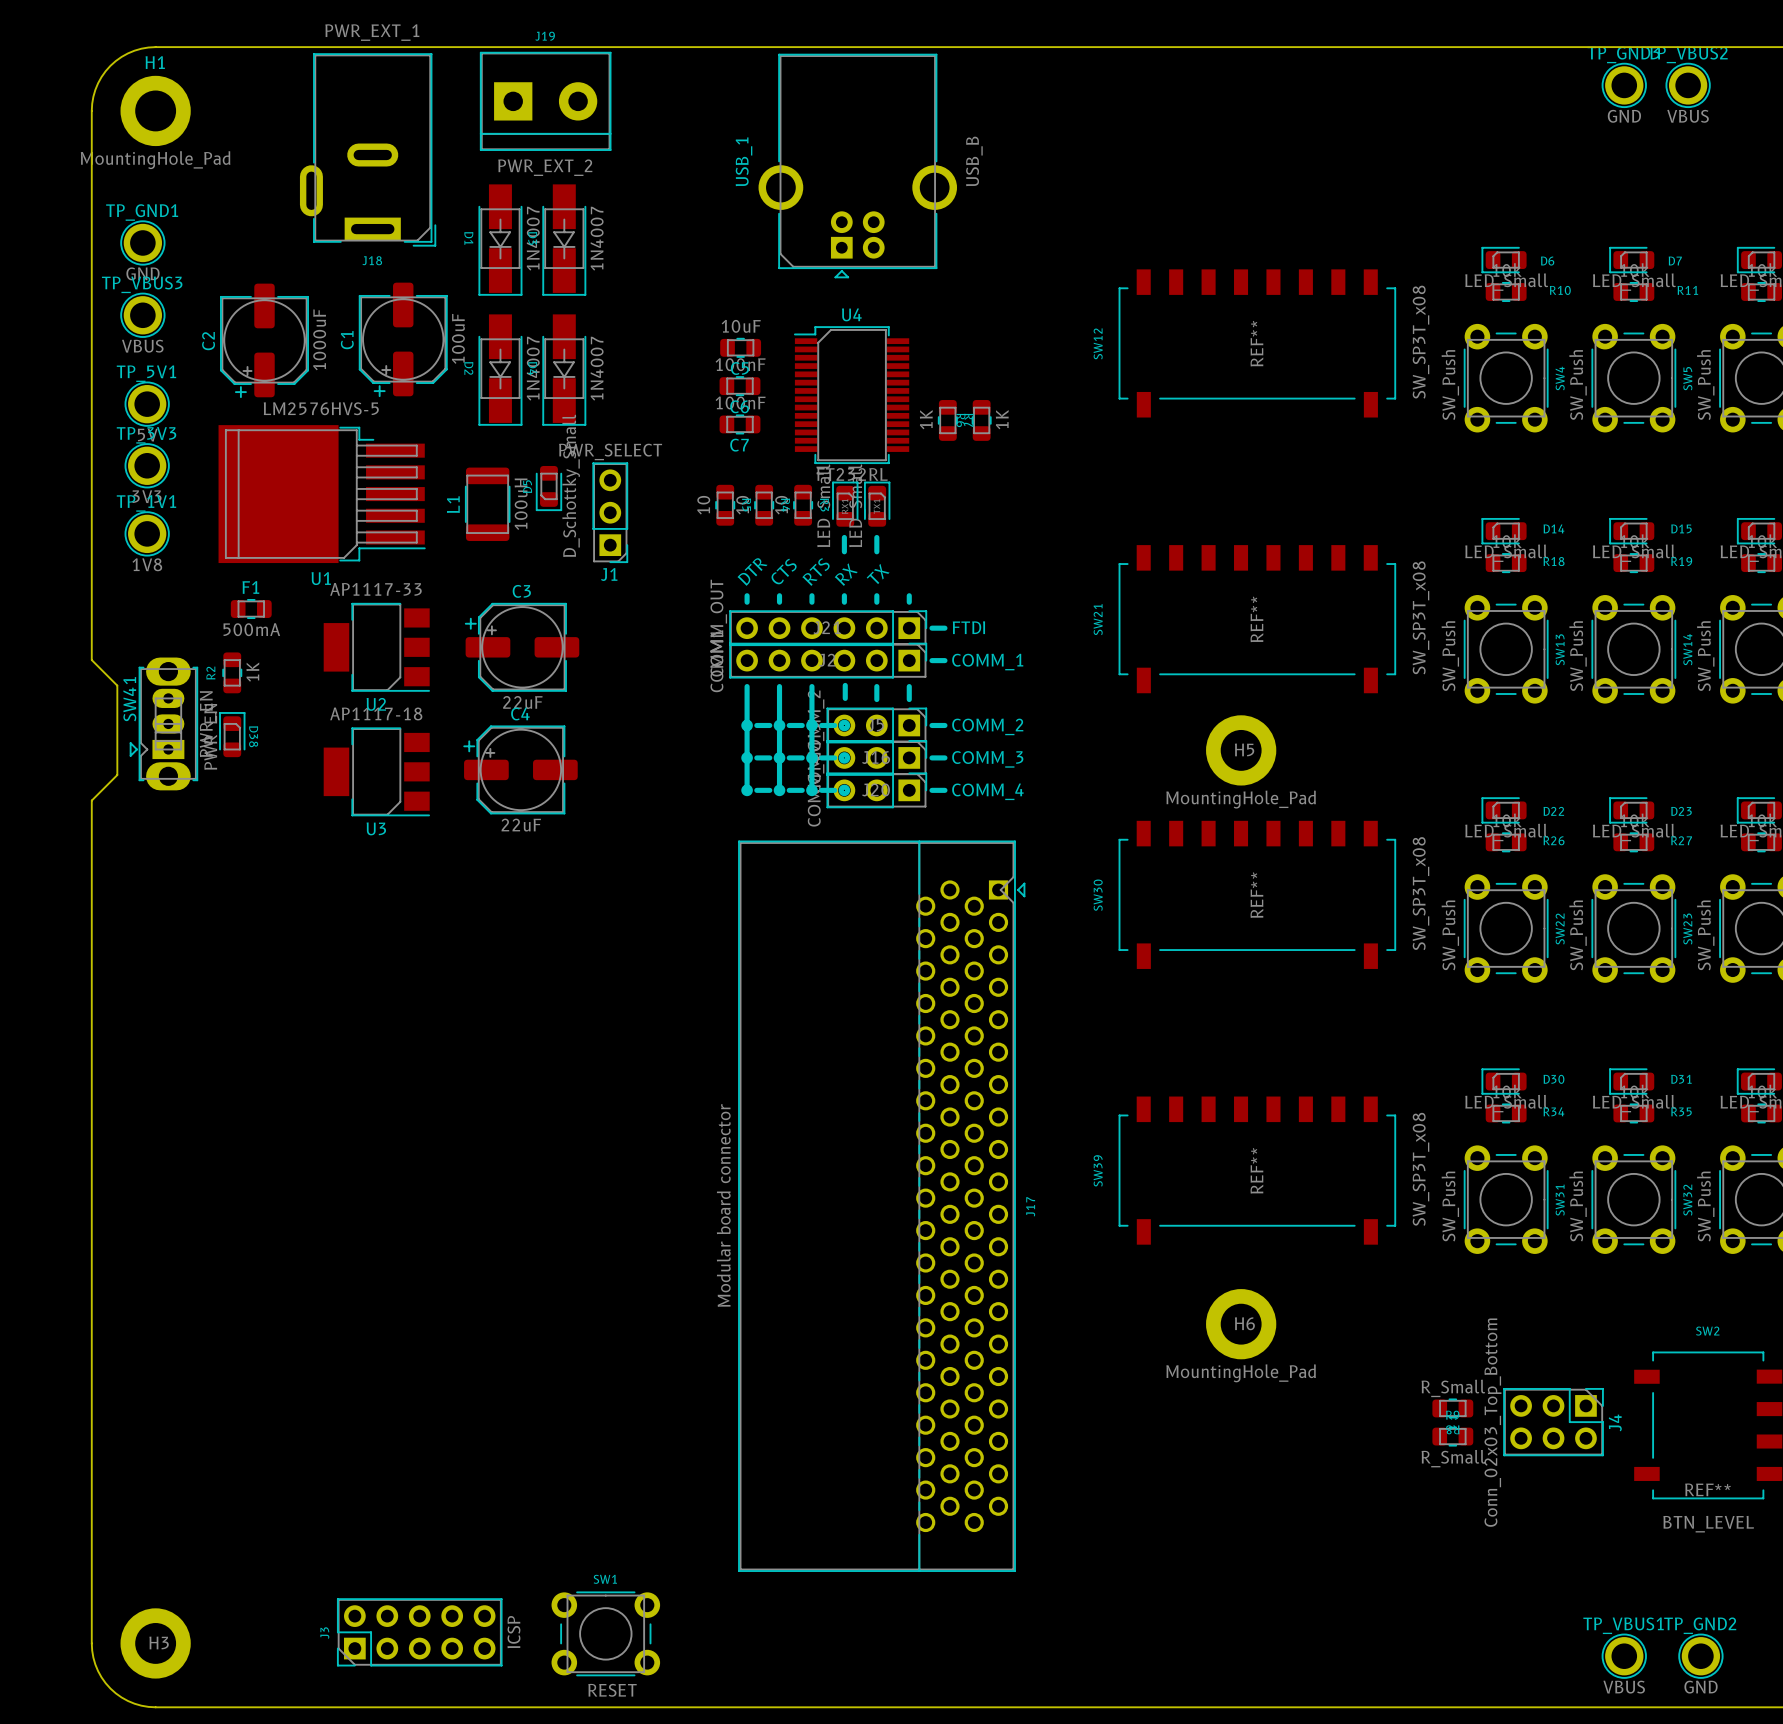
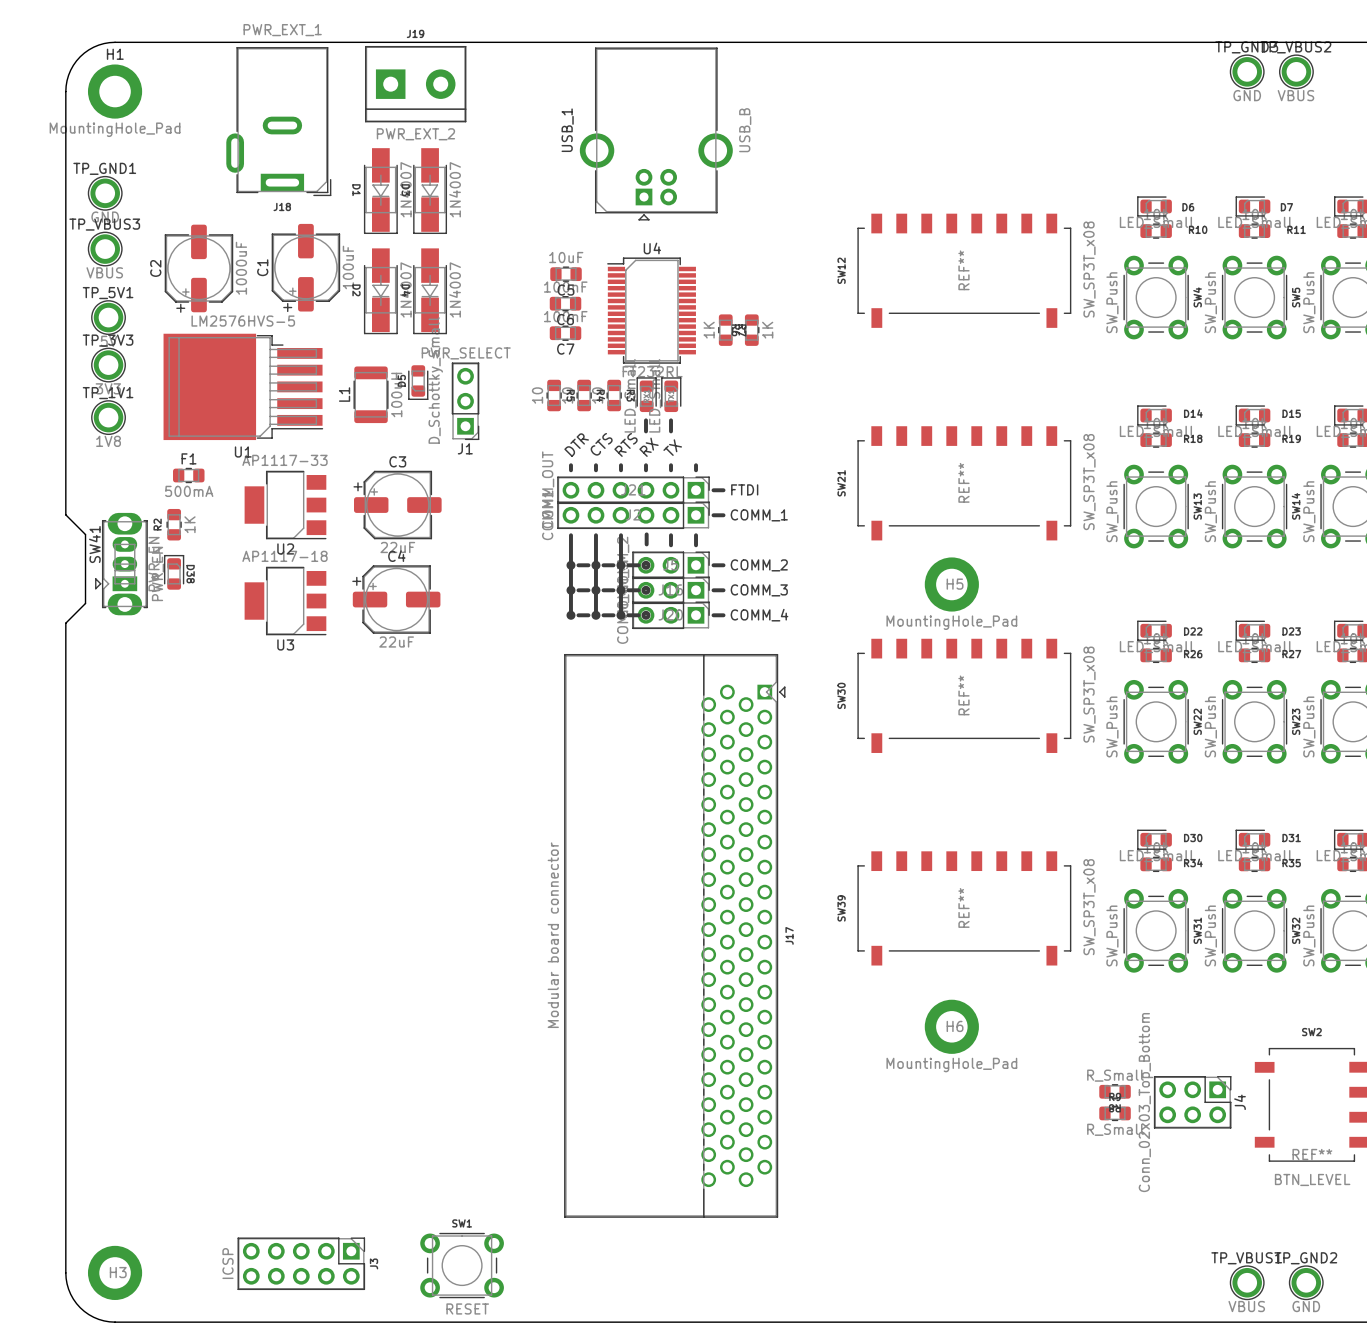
J3 rotation: 0° (419, 1632) -> 180° (301, 1263)

